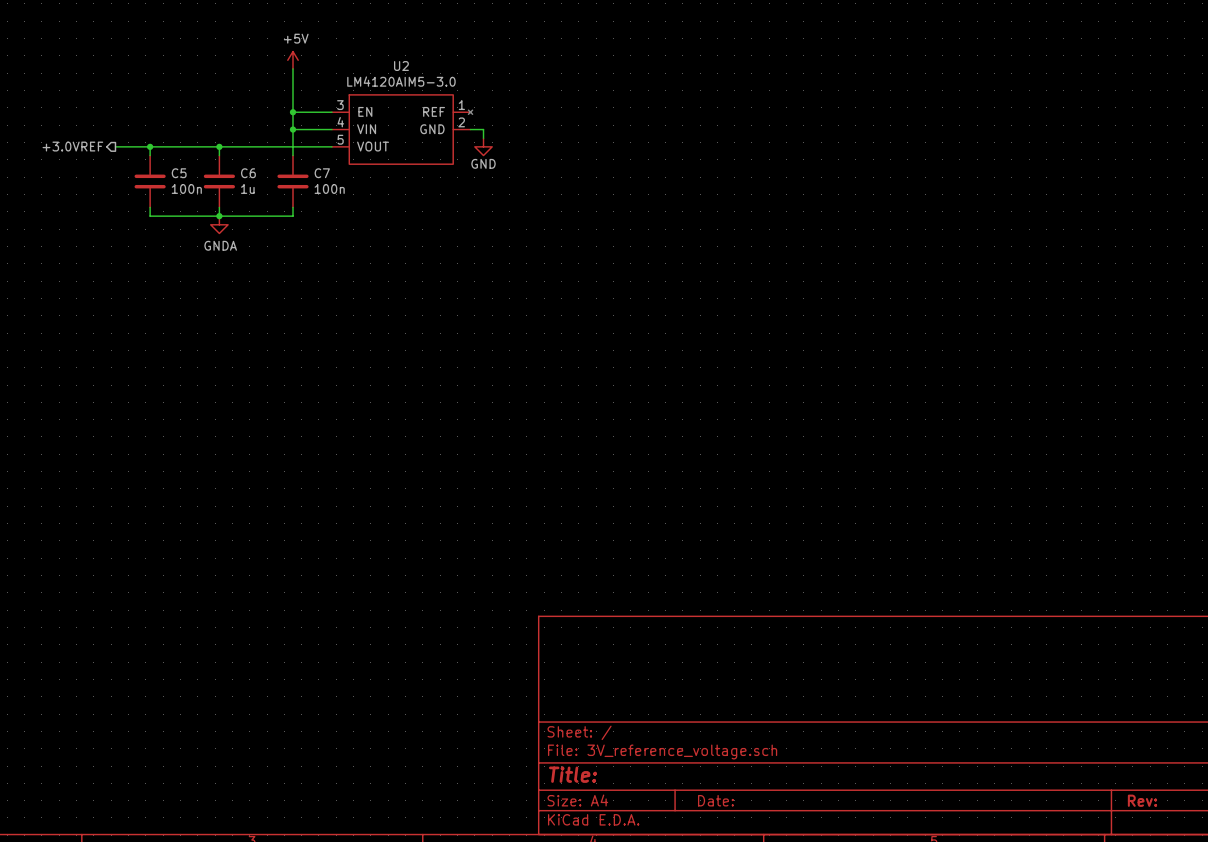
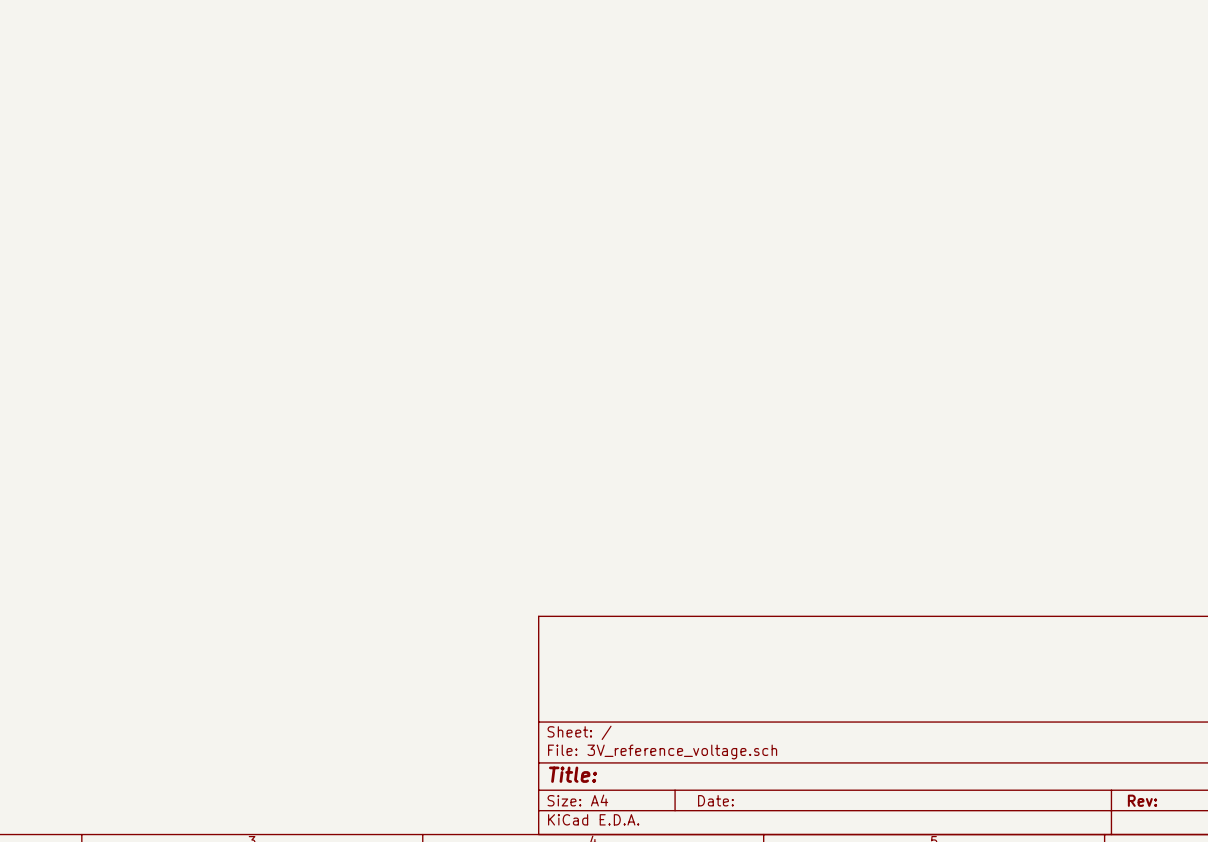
power symbol: +5V (293, 60) -> none
wire: (293, 68) (293, 155) -> none
wire: (293, 112) (331, 112) -> none
junction: (293, 112) -> none
wire: (293, 129) (331, 129) -> none
junction: (293, 129) -> none
U2: LM4120AIM5-3.0 (402, 129) -> none
wire: (470, 129) (483, 129) (483, 138) -> none
hierarchical label: +3.0VREF (72, 146) -> none
wire: (115, 146) (331, 146) -> none
wire: (150, 146) (150, 155) -> none
junction: (150, 146) -> none
wire: (219, 146) (219, 155) -> none
junction: (219, 146) -> none
power symbol: GND (483, 146) -> none
C5: 100n (150, 181) -> none
C6: 1u (219, 181) -> none
C7: 100n (293, 181) -> none
wire: (150, 207) (150, 216) (293, 216) (293, 207) -> none
wire: (219, 207) (219, 216) -> none
junction: (219, 216) -> none
power symbol: GNDA (219, 224) -> none

